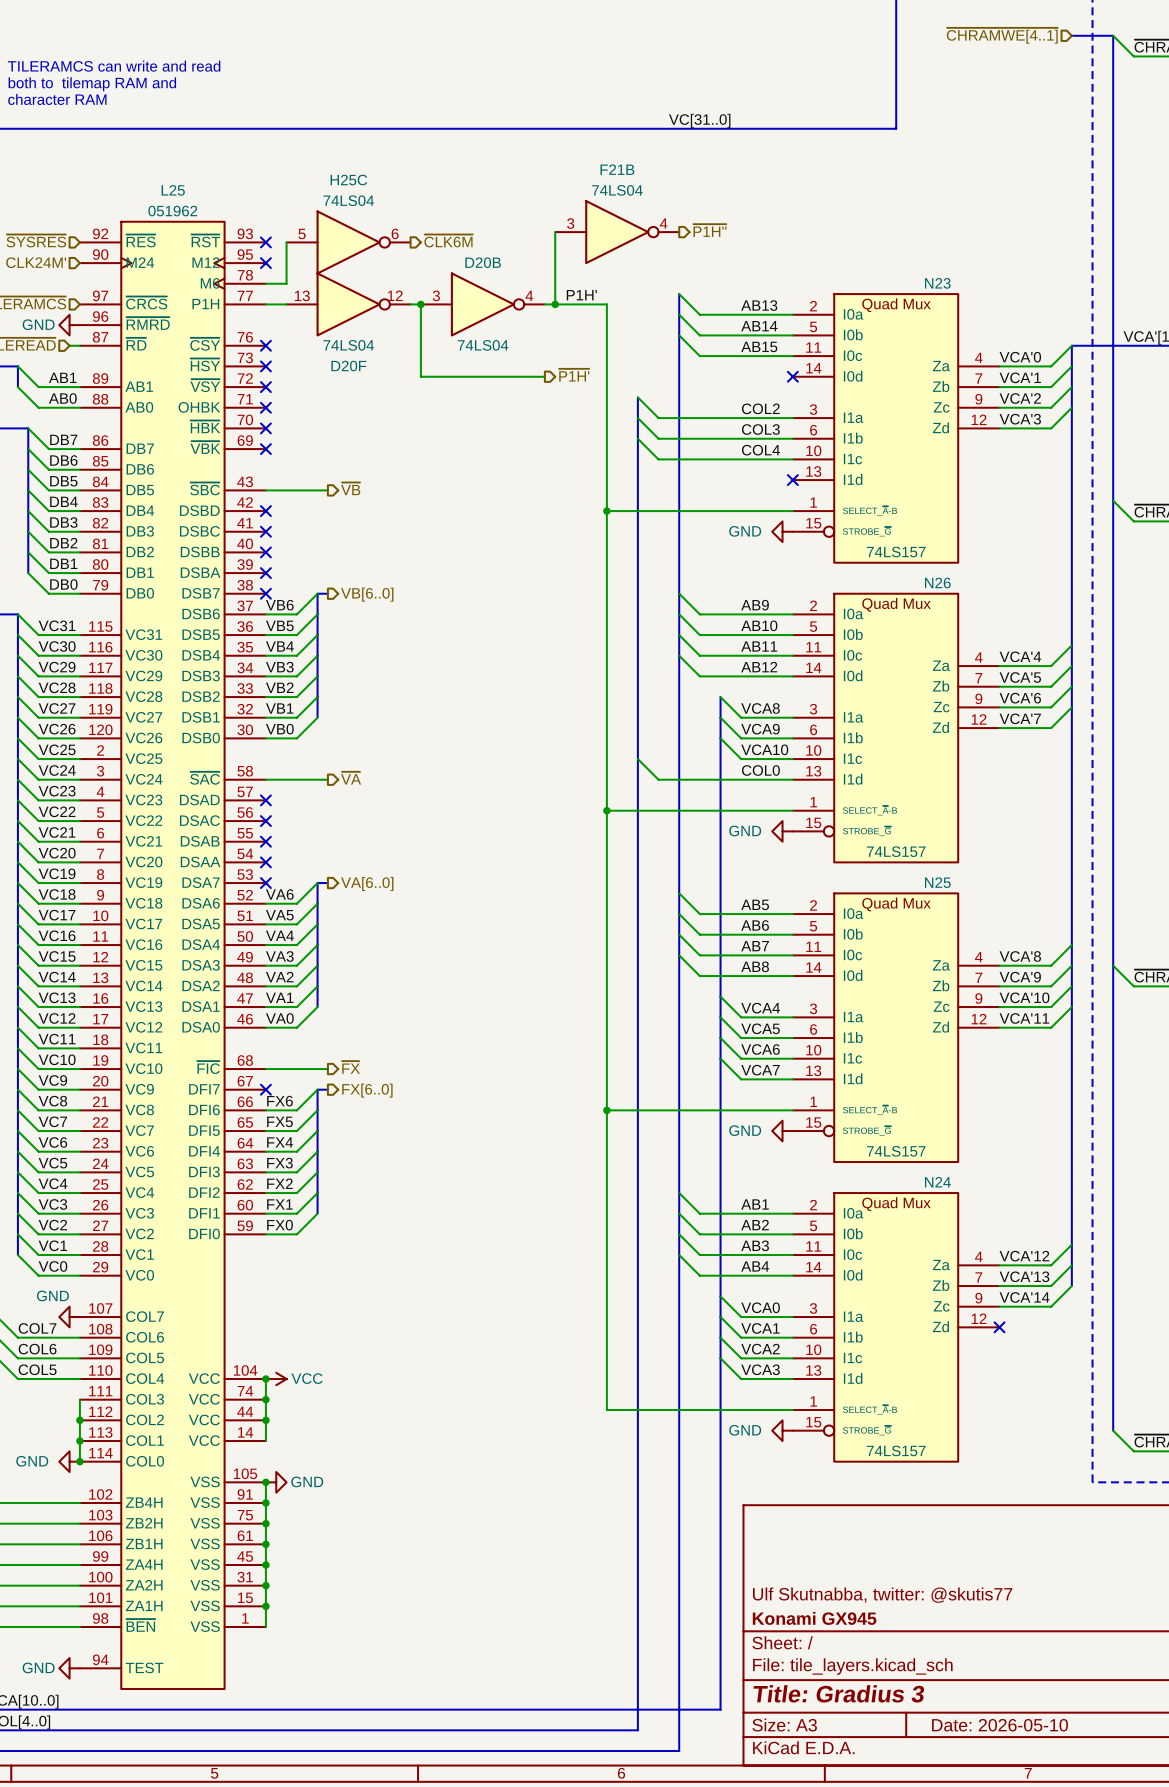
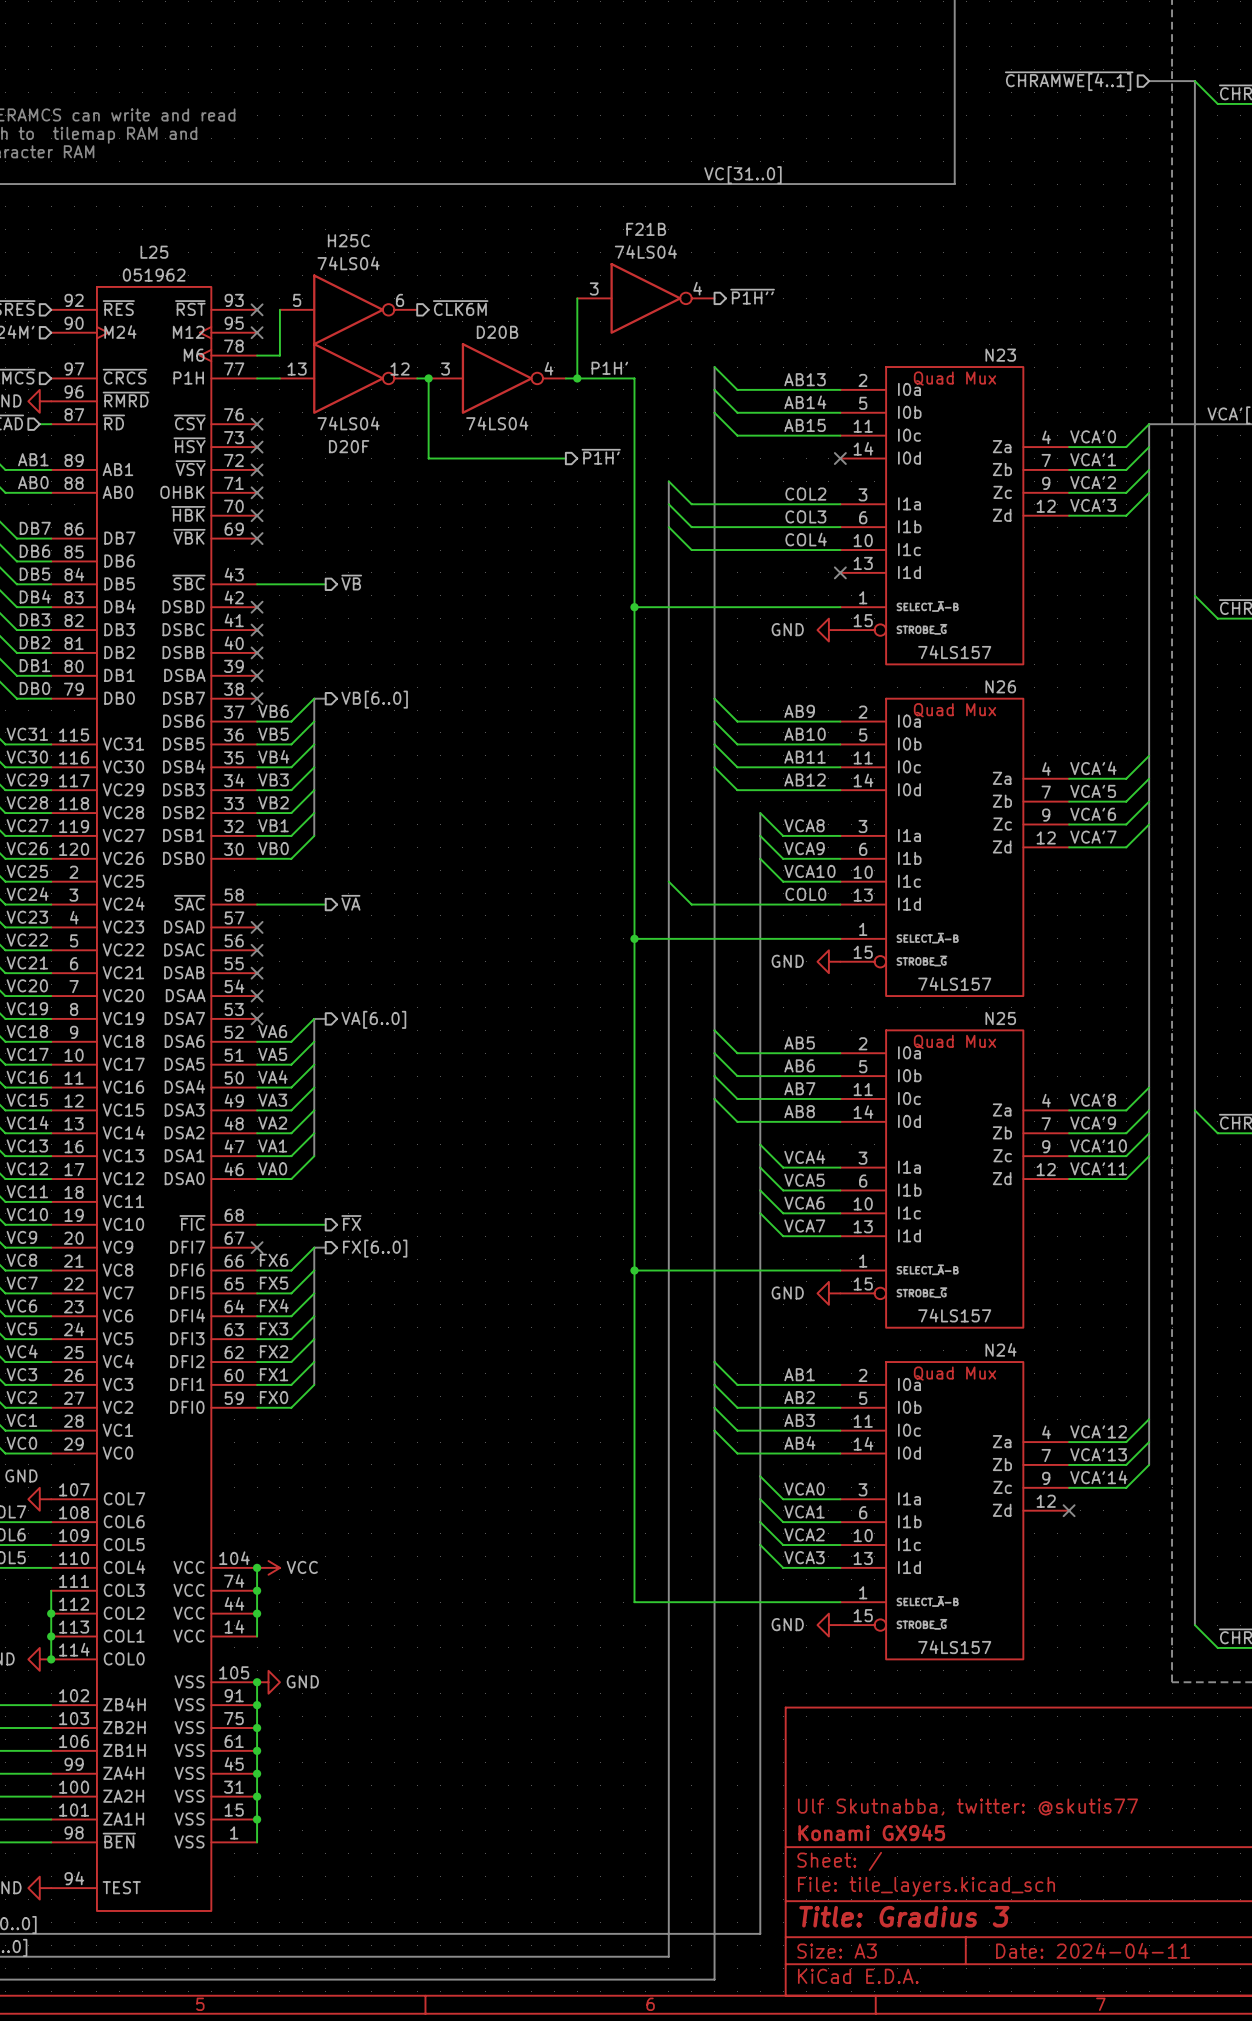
title block: Date: 2026-05-10 (1000, 1725) -> Date: 2024-04-11 (1093, 1950)

